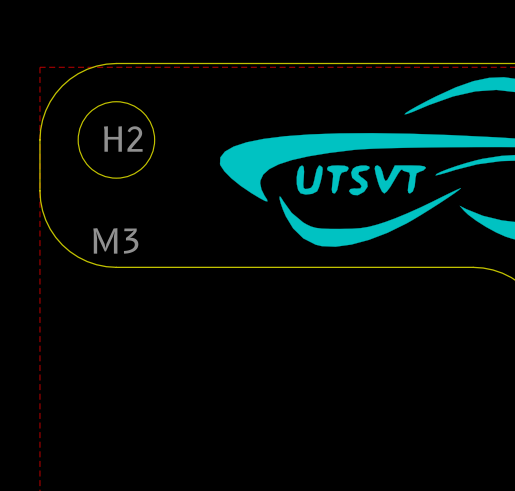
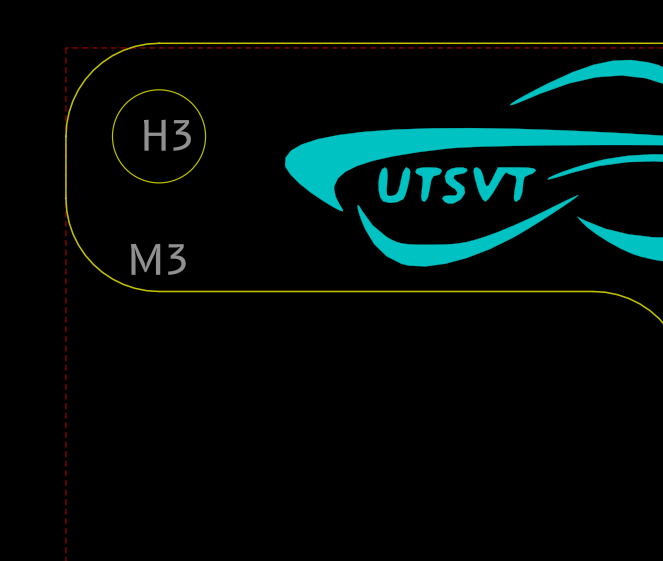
H2 name: H2 (123, 138) -> H3 (167, 135)

